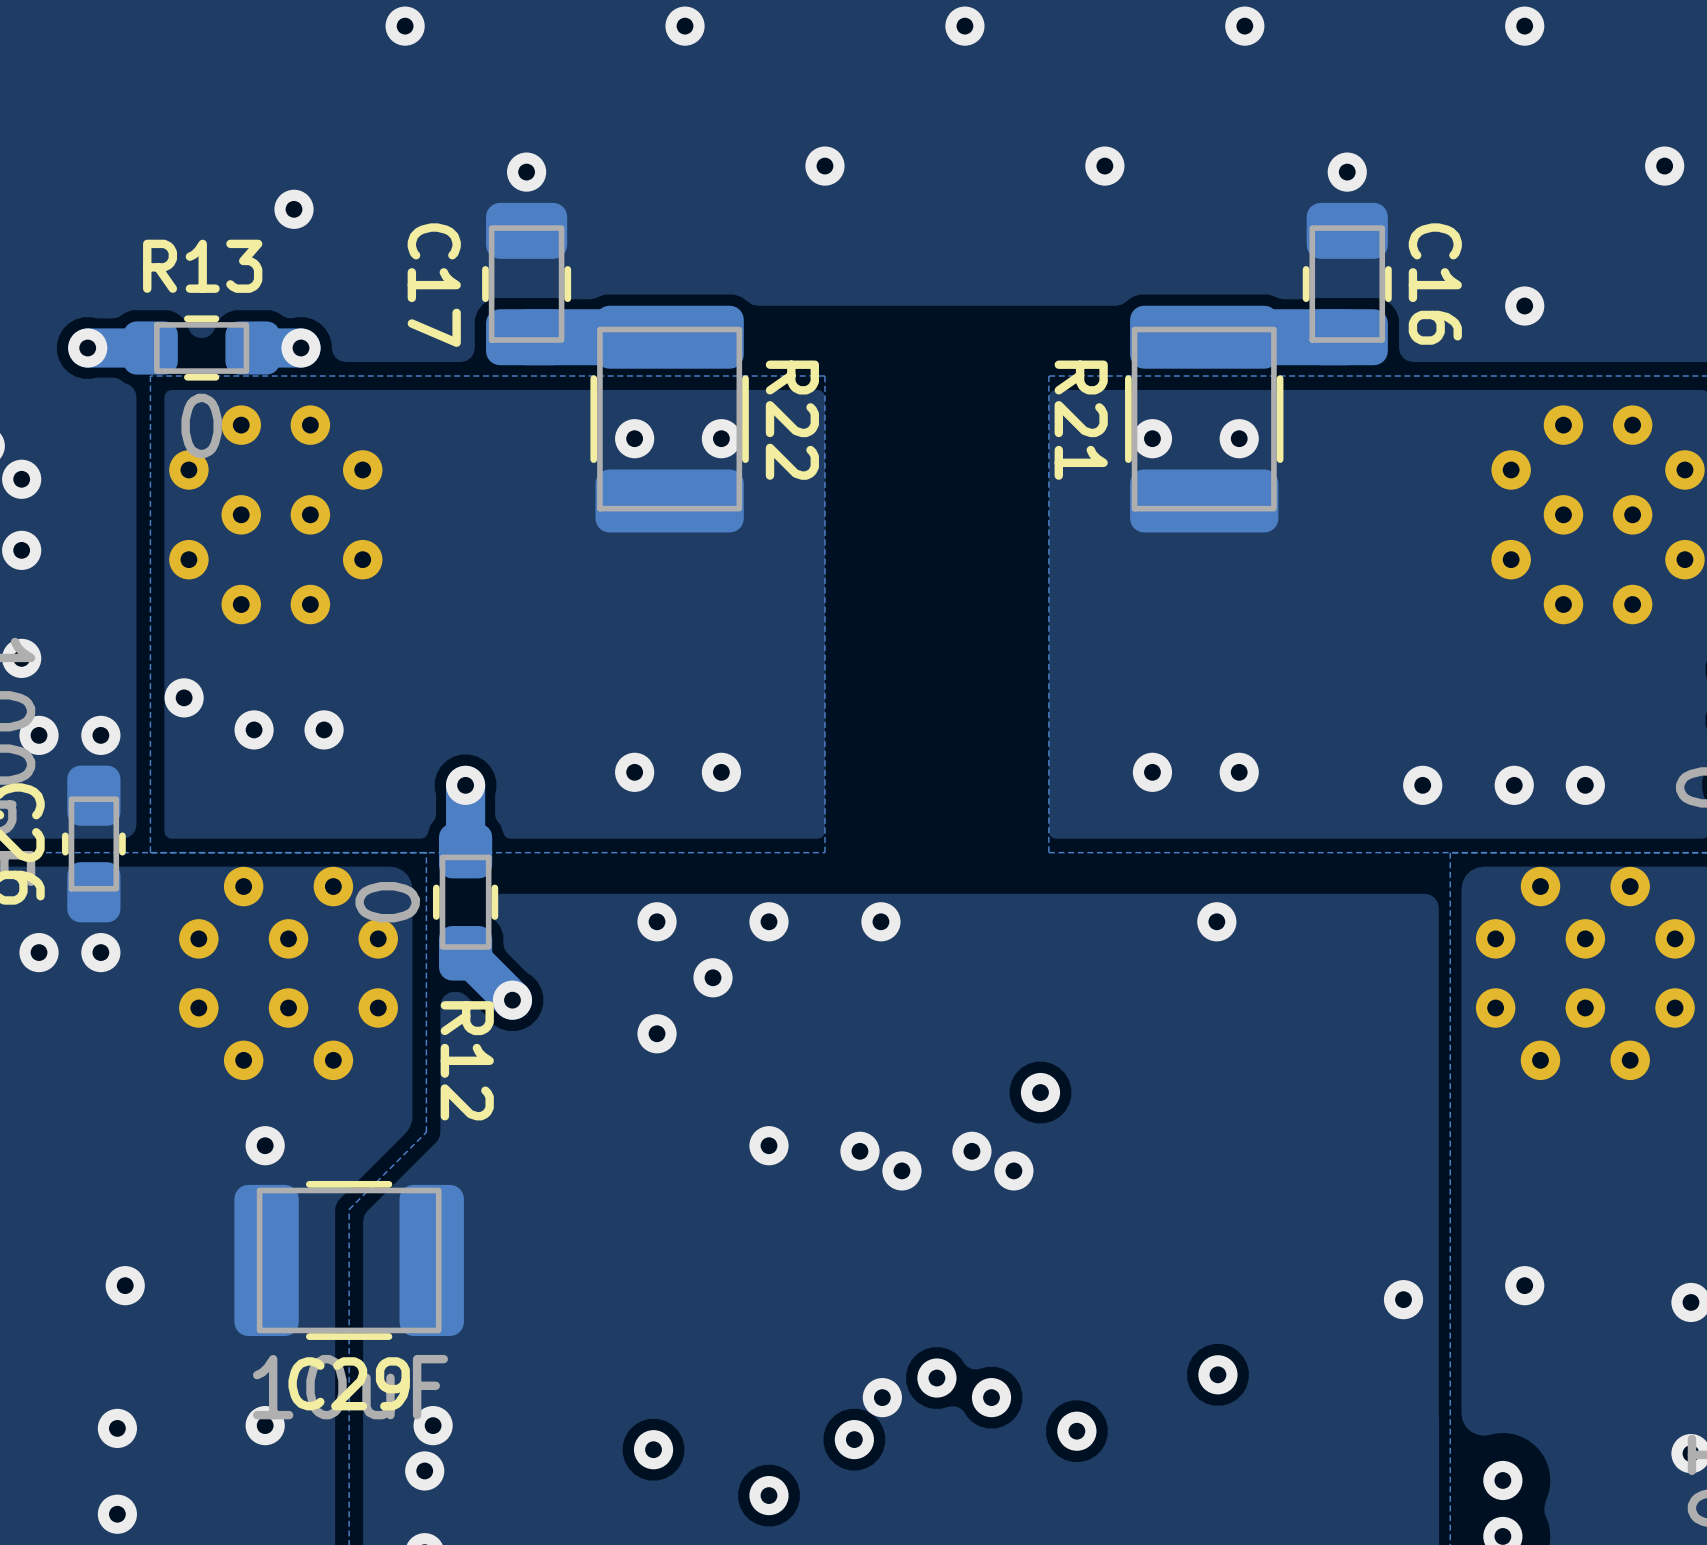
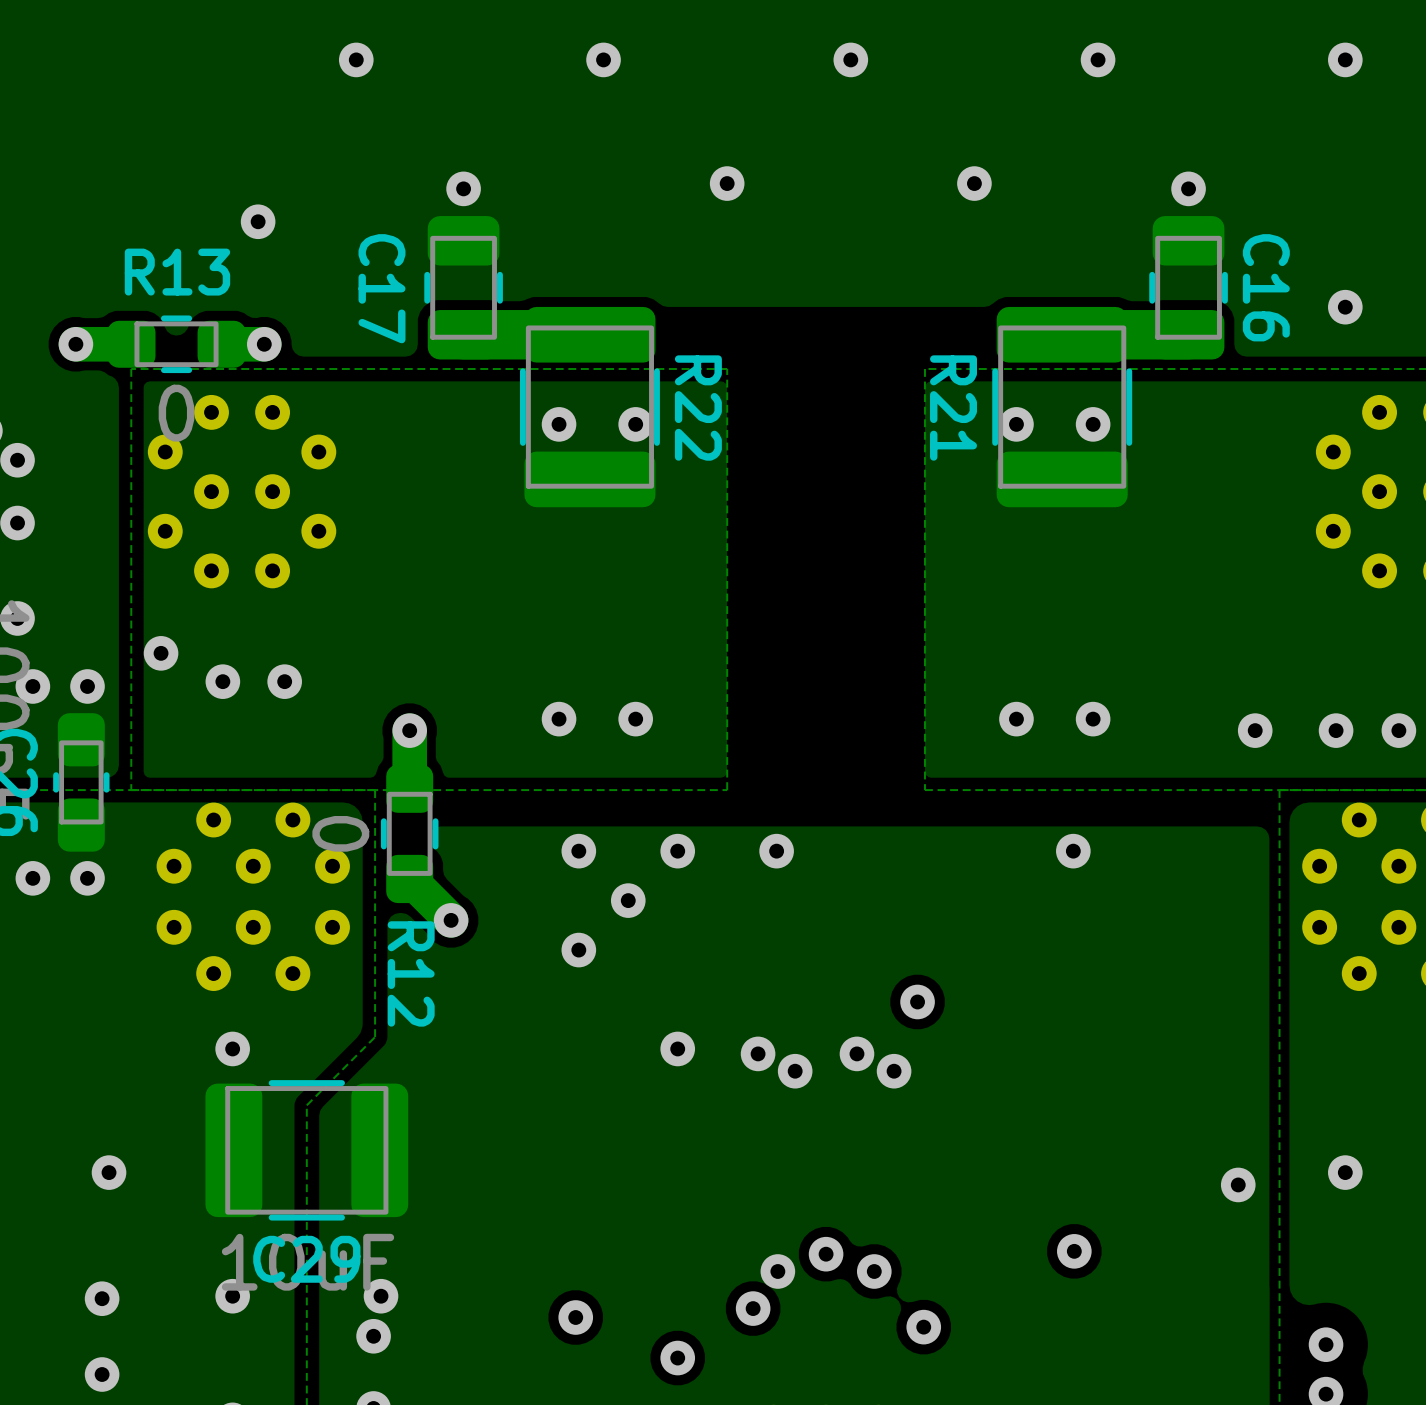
via position: (1076, 1431) -> (923, 1327)

